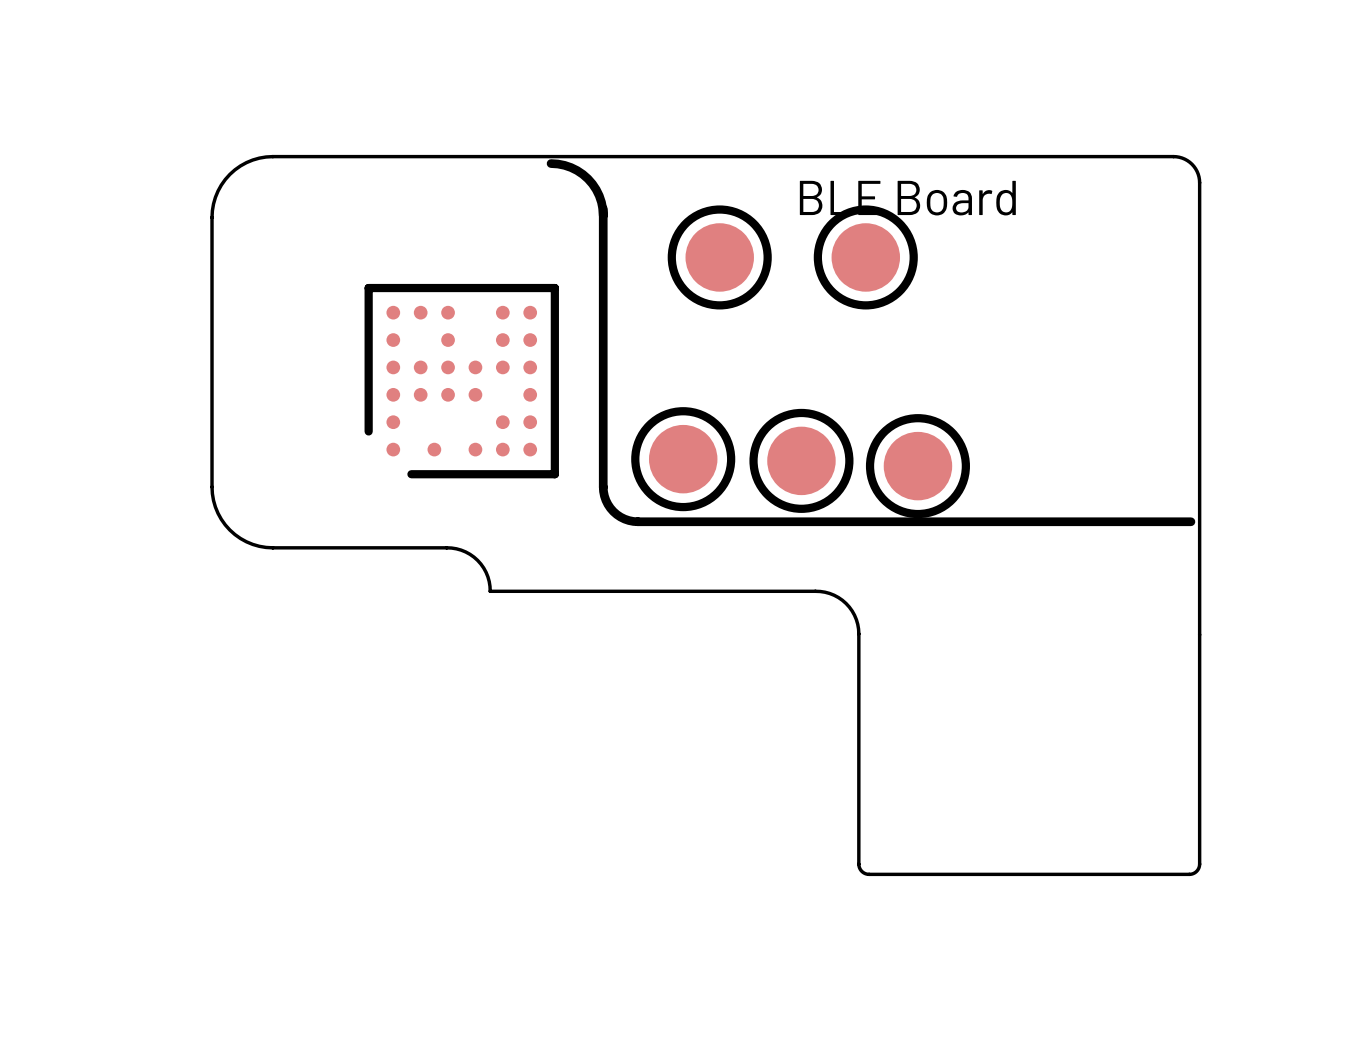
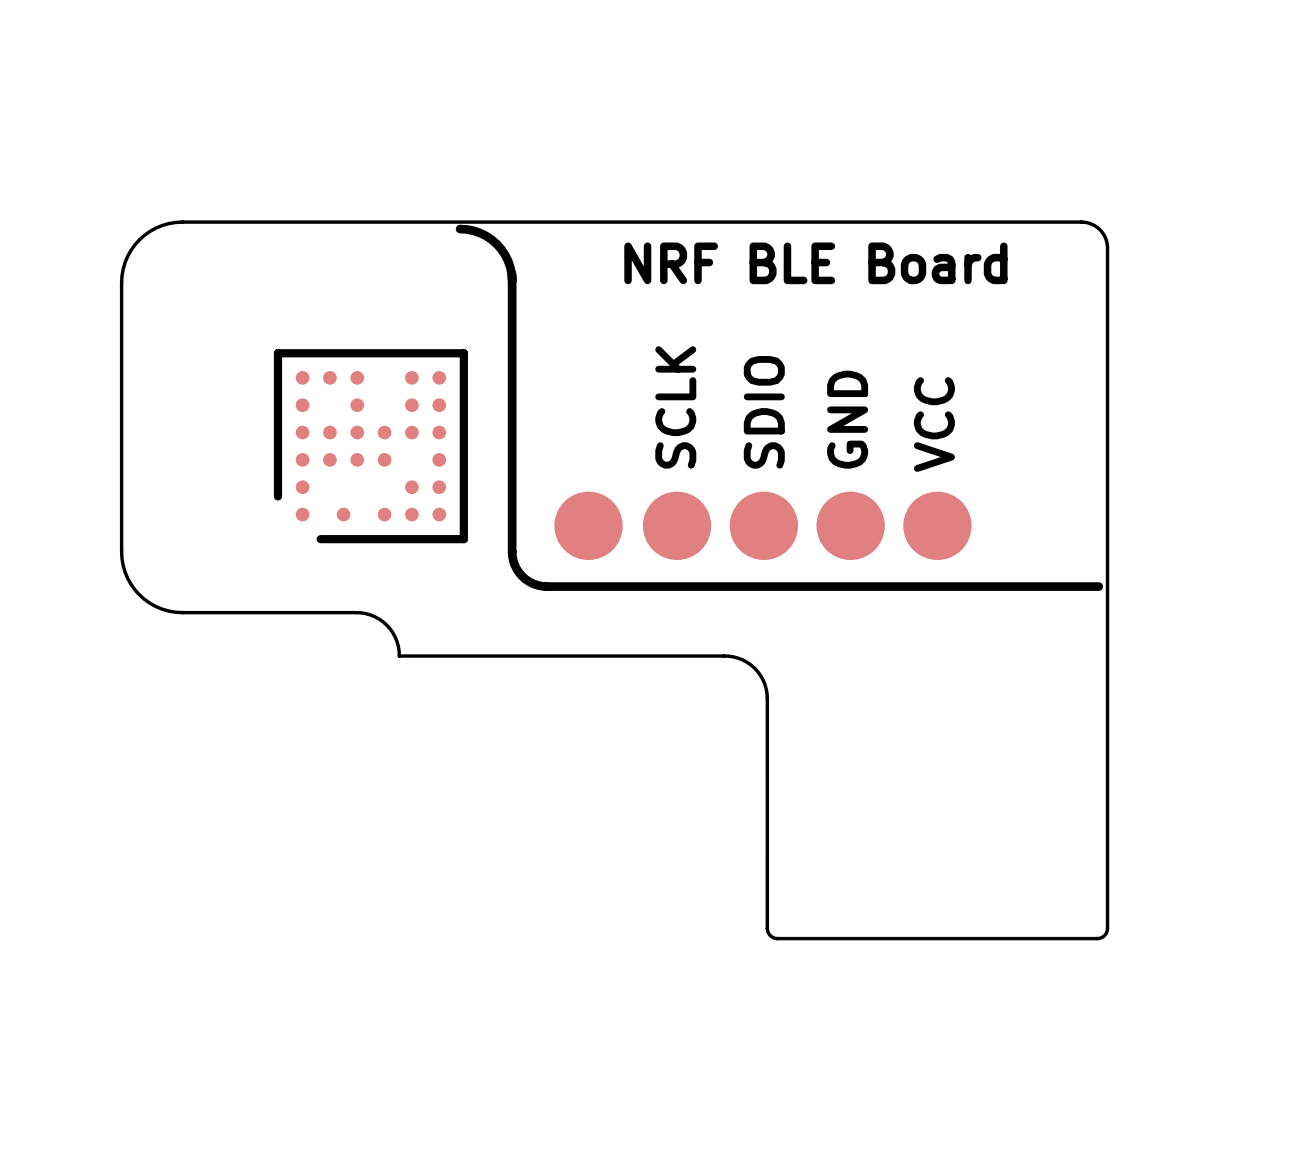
text: BLE Board (907, 198) -> NRF BLE Board (815, 263)
part: (719, 257) -> none
part: (865, 257) -> none
text: none -> SCLK (675, 407)
text: none -> SDIO (764, 412)
text: none -> GND (847, 419)
text: none -> VCC (934, 424)
part footprint: [631, 407, 736, 512] -> [554, 491, 623, 561]
part footprint: [865, 414, 970, 519] -> [642, 491, 972, 561]
part: (801, 460) -> none

